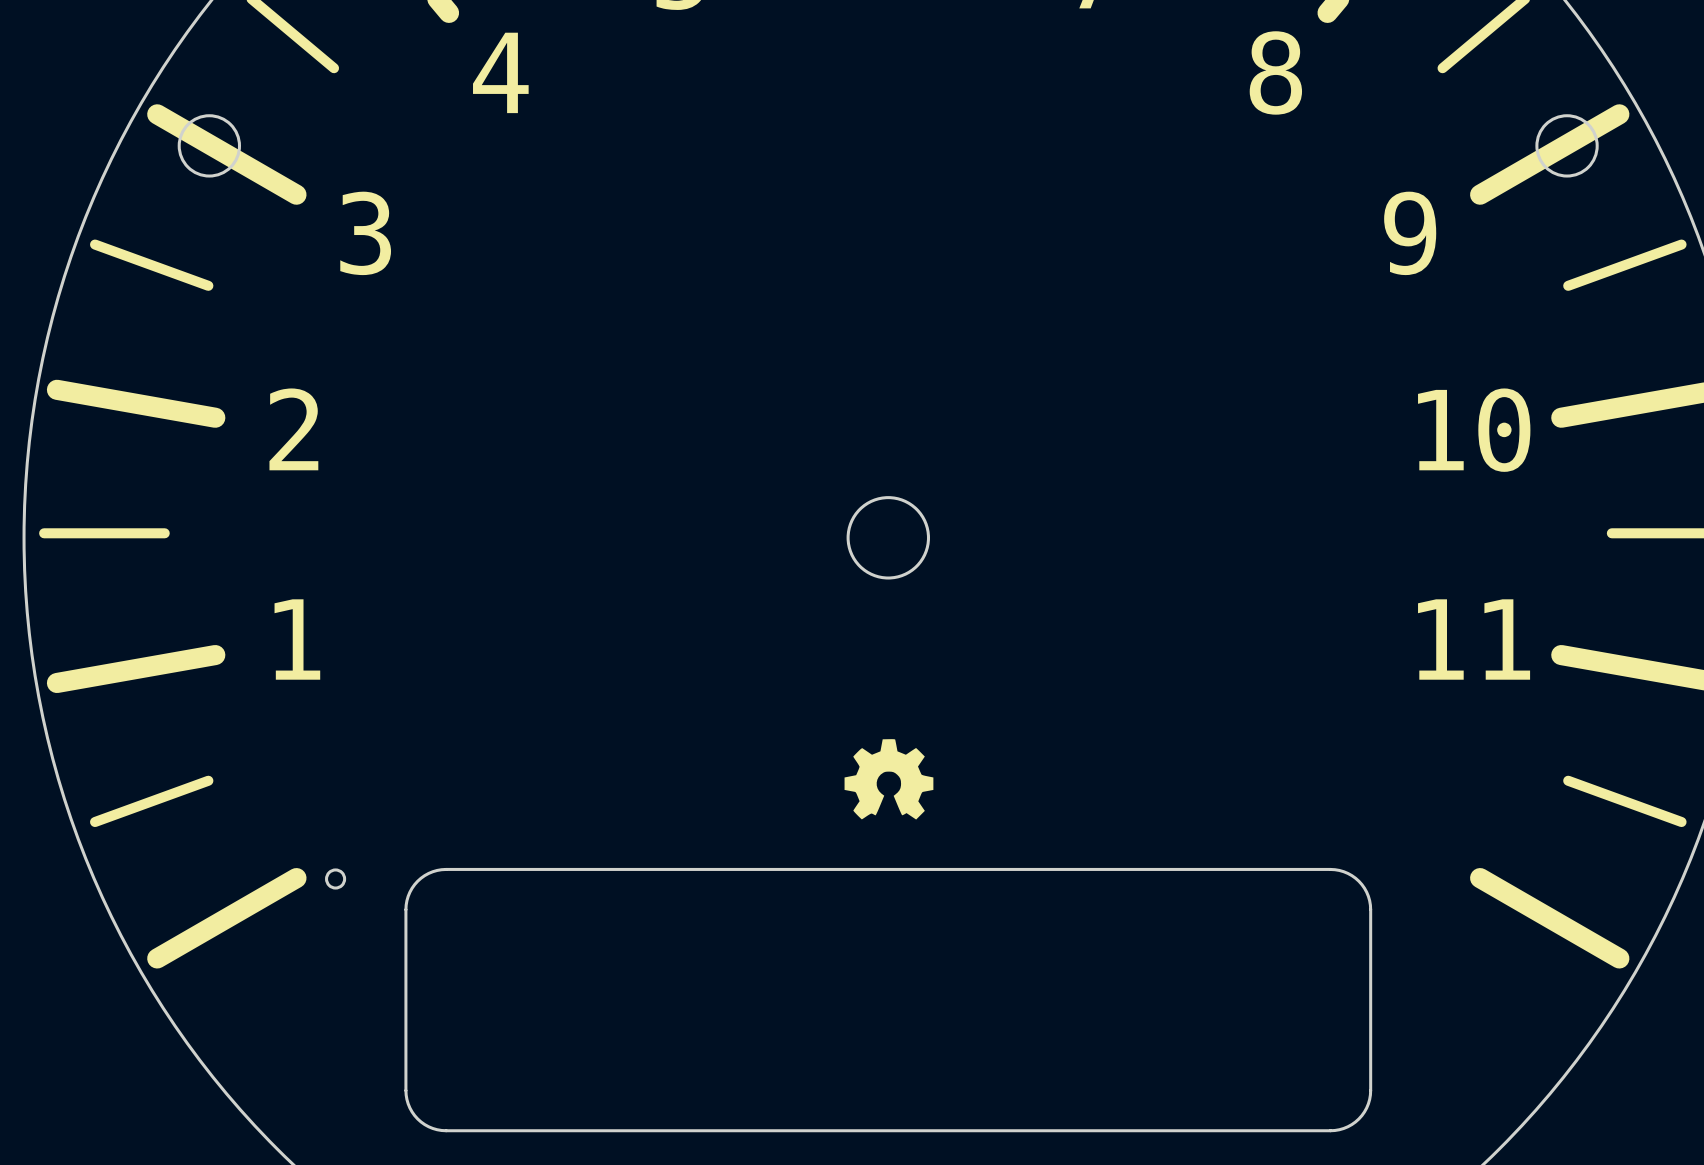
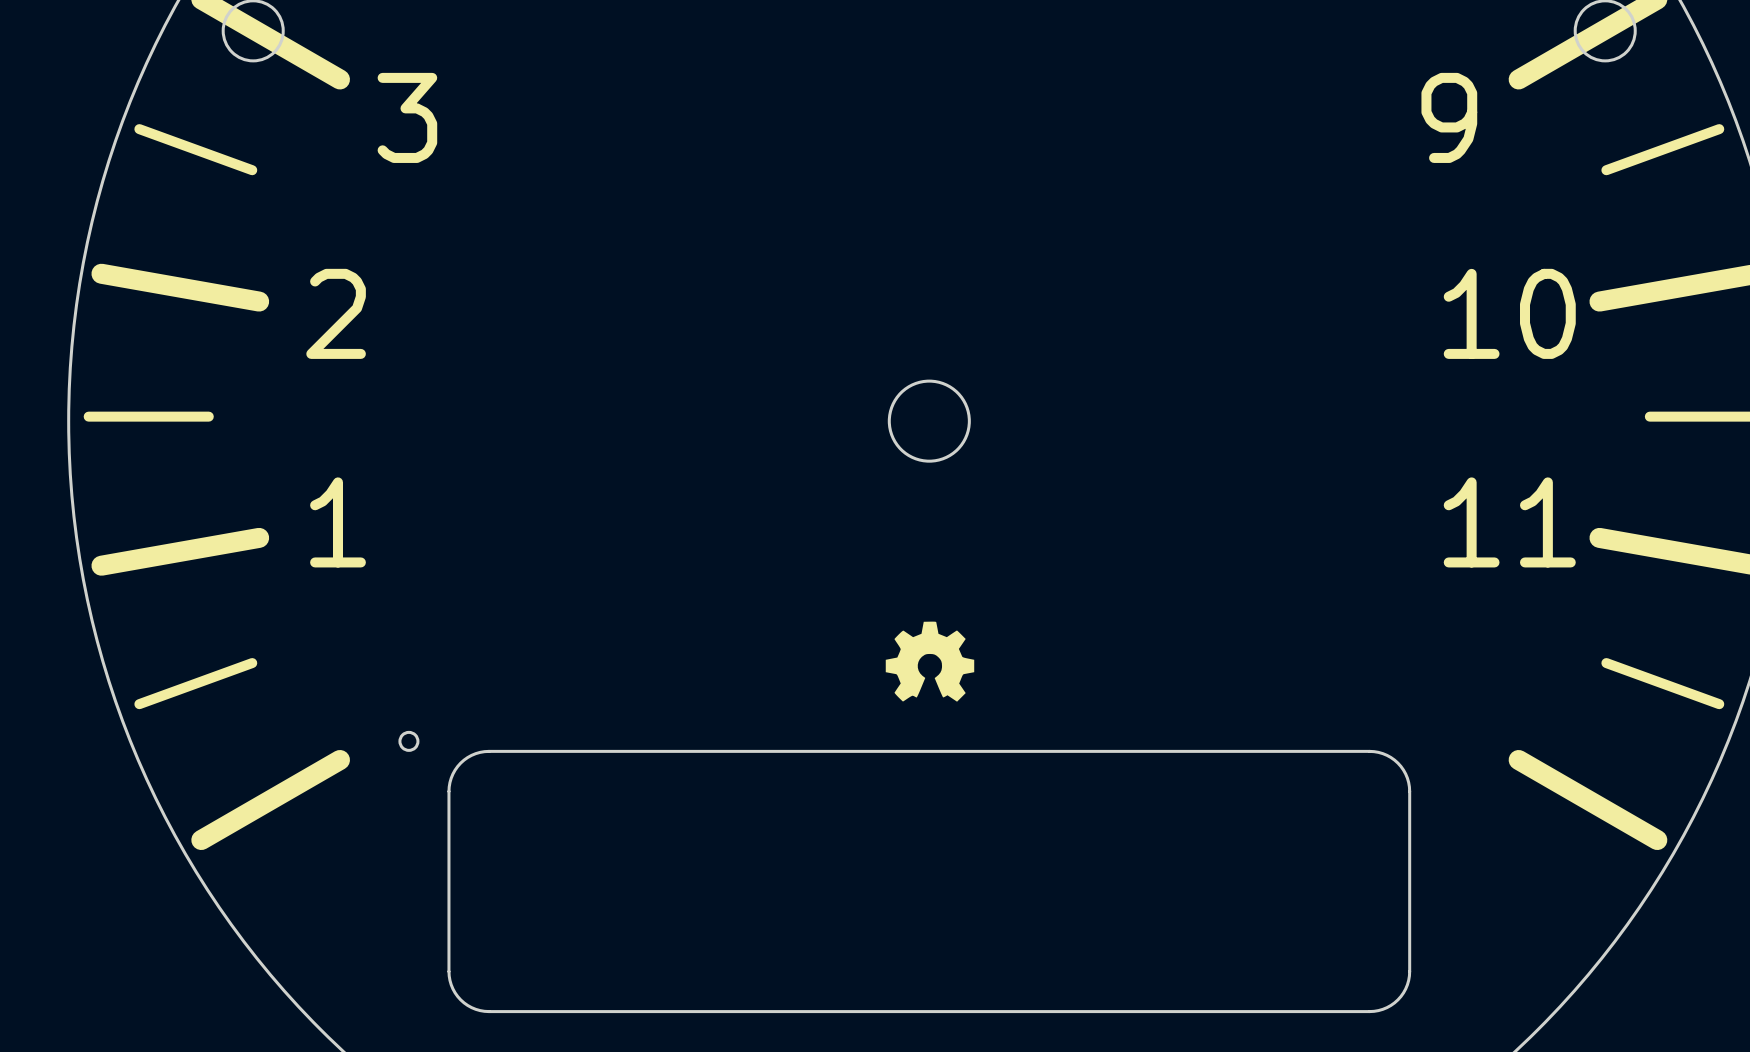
round board edge position: (335, 878) -> (408, 741)

